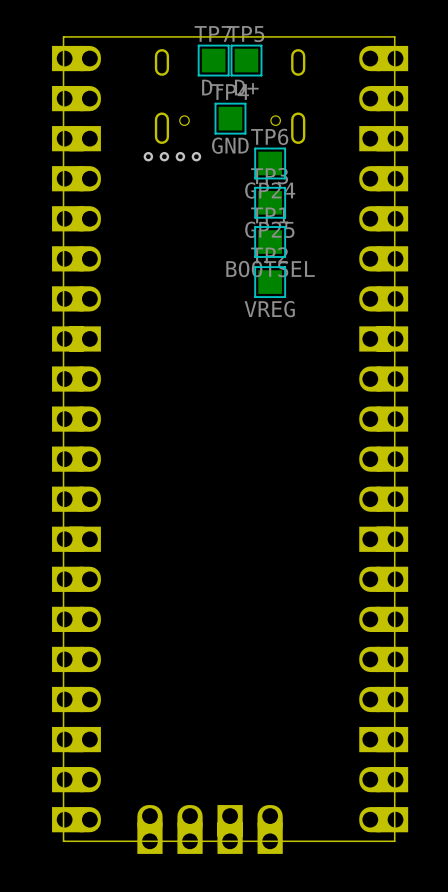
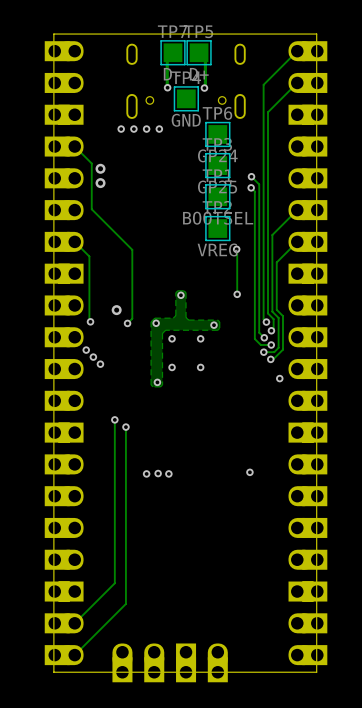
track: none -> (297, 51) (263, 84) (263, 319) (266, 322)
track: none -> (173, 52) (167, 58) (167, 87)
track: none -> (199, 52) (205, 59) (204, 88)
track: none -> (297, 82) (267, 112) (267, 313) (273, 319) (273, 328) (271, 330)
via: none -> (167, 87)
via: none -> (204, 88)
track: none -> (74, 146) (91, 163) (91, 209) (132, 249) (132, 318) (127, 323)
via: none -> (100, 168)
track: none -> (251, 176) (259, 184) (259, 332) (264, 337)
via: none -> (251, 176)
via: none -> (100, 183)
track: none -> (251, 187) (254, 191) (254, 339) (260, 344) (271, 345)
via: none -> (251, 187)
track: none -> (297, 210) (272, 235) (272, 311) (278, 317) (278, 347) (274, 352) (263, 352)
track: none -> (74, 241) (89, 256) (90, 321)
track: none -> (297, 241) (276, 262) (276, 309) (282, 316) (282, 349) (273, 359) (270, 359)
track: none -> (236, 249) (237, 294)
via: none -> (236, 249)
zone outline: none -> (184, 290) (186, 292) (186, 317) (188, 320) (217, 320) (219, 328) (217, 330) (165, 330) (162, 333) (162, 384) (152, 386) (151, 384) (151, 321) (154, 318) (173, 318) (175, 315) (175, 292) (184, 290)
via: none -> (237, 294)
via: none -> (180, 295)
via: none -> (116, 310)
via: none -> (90, 321)
via: none -> (266, 322)
via: none -> (127, 323)
via: none -> (156, 323)
via: none -> (214, 325)
via: none -> (271, 330)
via: none -> (264, 337)
via: none -> (172, 338)
via: none -> (200, 338)
via: none -> (271, 345)
via: none -> (86, 350)
via: none -> (263, 352)
via: none -> (93, 357)
via: none -> (270, 359)
via: none -> (100, 364)
via: none -> (172, 367)
via: none -> (200, 367)
via: none -> (279, 378)
via: none -> (157, 382)
track: none -> (114, 419) (114, 583) (74, 623)
via: none -> (114, 419)
track: none -> (125, 427) (125, 603) (74, 655)
via: none -> (125, 427)
via: none -> (249, 472)
via: none -> (158, 473)
via: none -> (146, 473)
via: none -> (168, 473)

